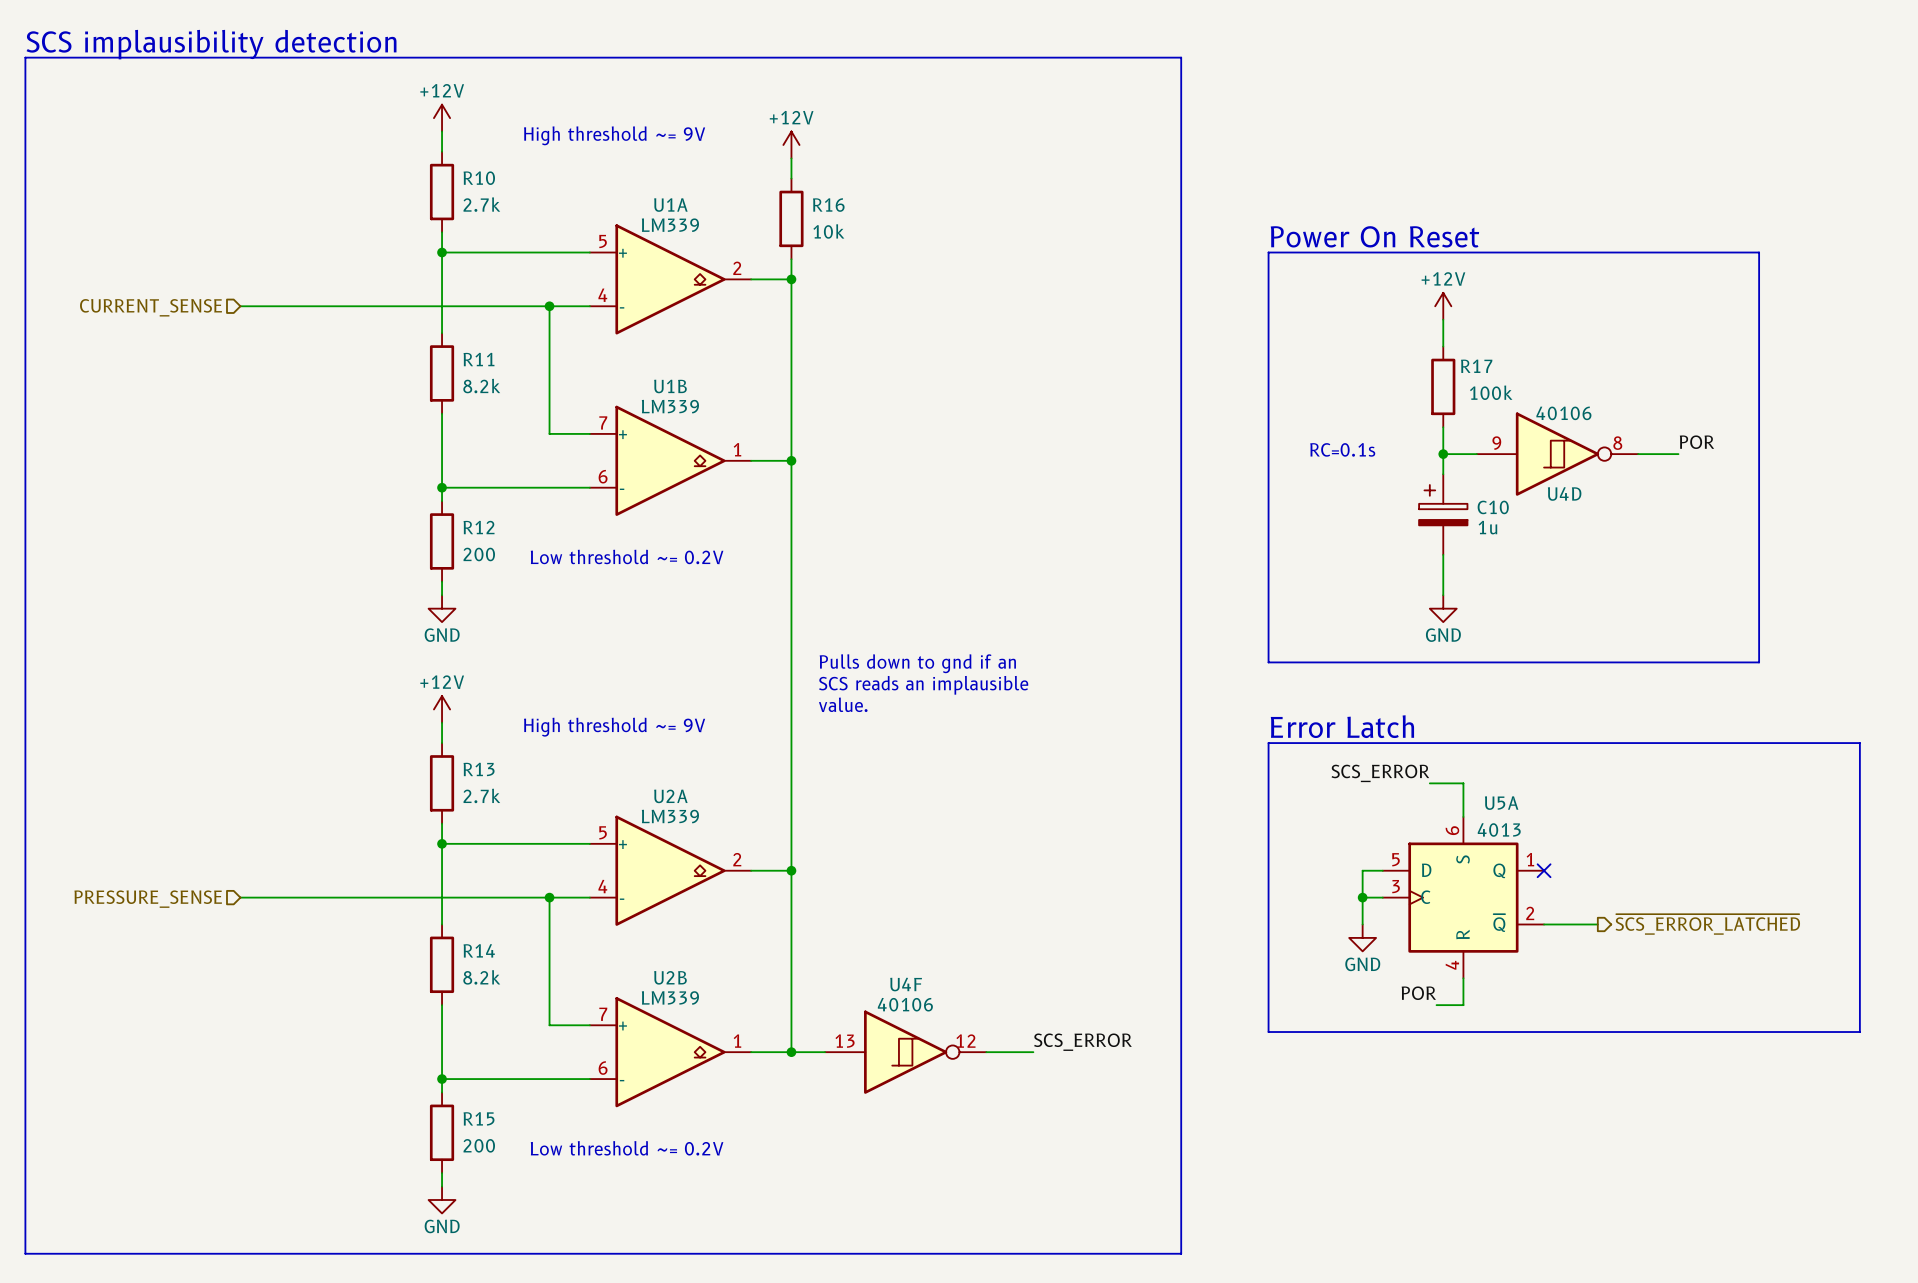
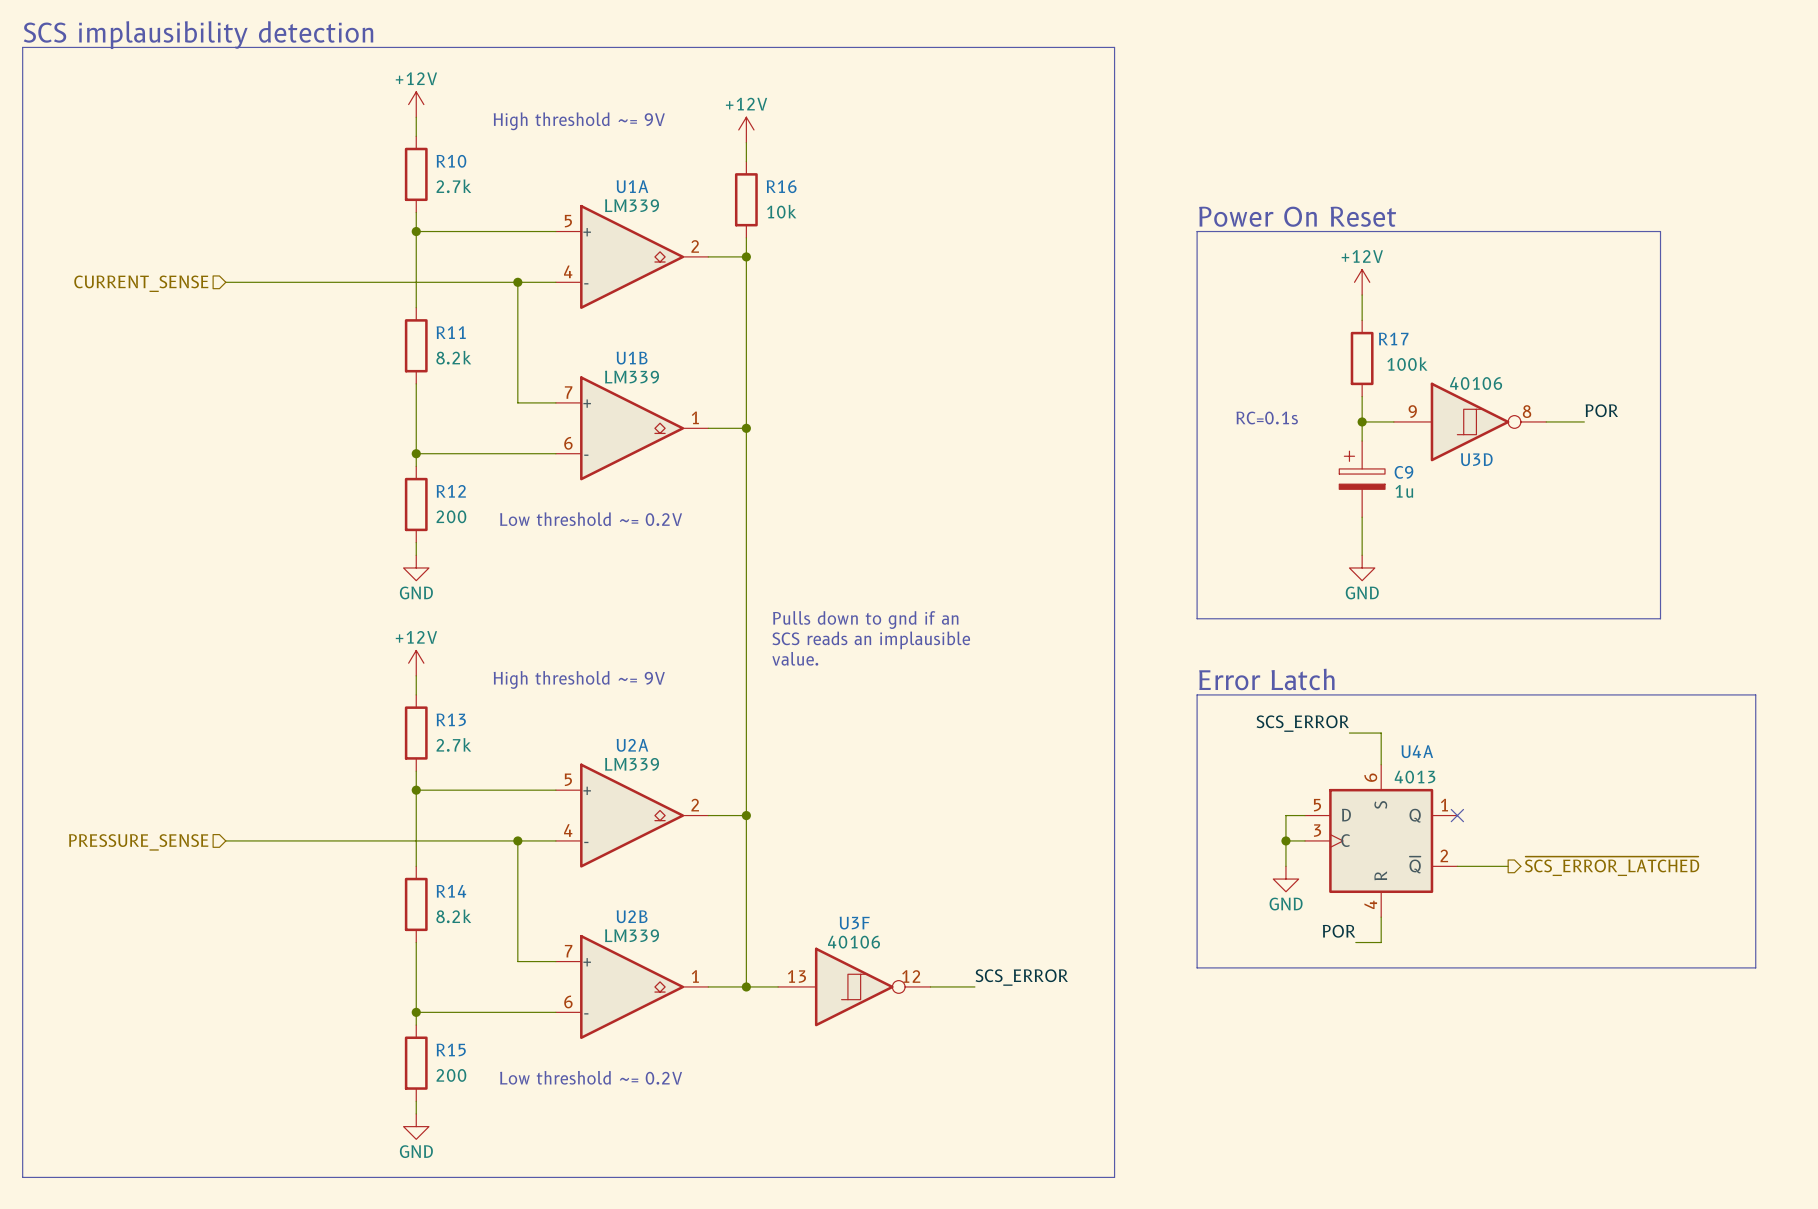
U4D name: U4D (1564, 493) -> U3D (1476, 459)
C10 name: C10 (1493, 507) -> C9 (1403, 472)
U5A name: U5A (1501, 803) -> U4A (1417, 751)
U4F name: U4F (906, 984) -> U3F (854, 923)

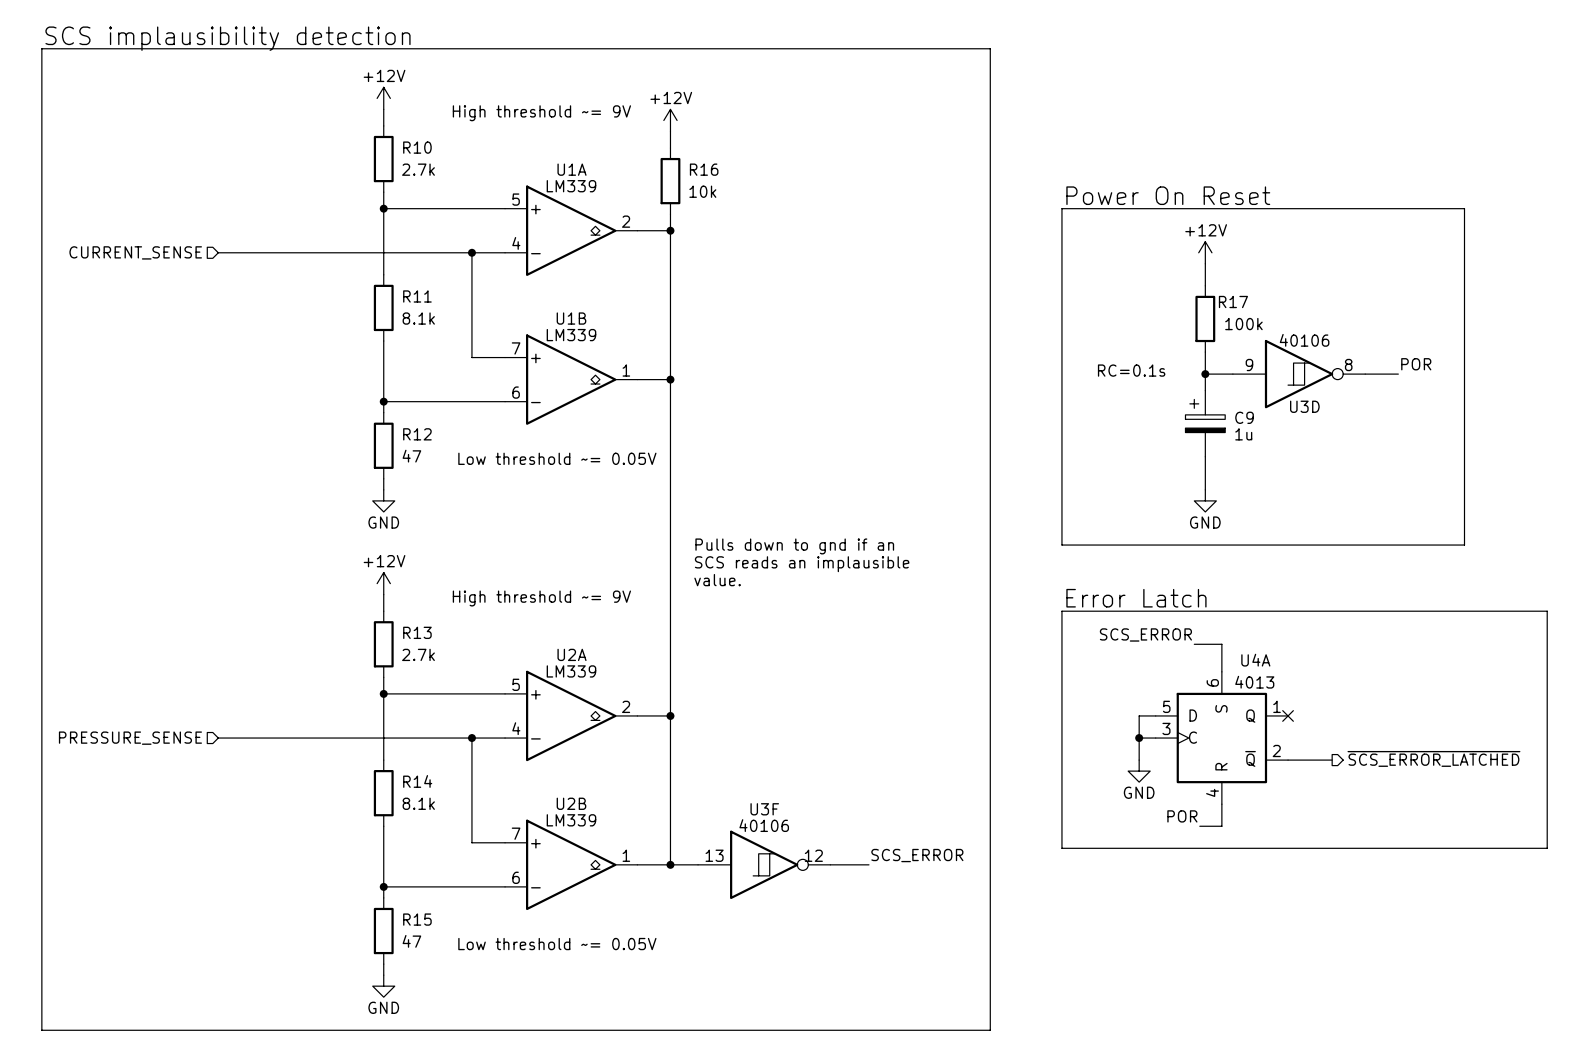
R11 value: 8.2k (453, 357) -> 8.1k (418, 318)
R12 value: 200 (451, 516) -> 47 (411, 456)
text: Low threshold ~= 0.2V (591, 519) -> Low threshold ~= 0.05V (557, 458)
R14 value: 8.2k (453, 916) -> 8.1k (418, 803)
R15 value: 200 (451, 1075) -> 47 (411, 941)
text: Low threshold ~= 0.2V (591, 1077) -> Low threshold ~= 0.05V (557, 944)

